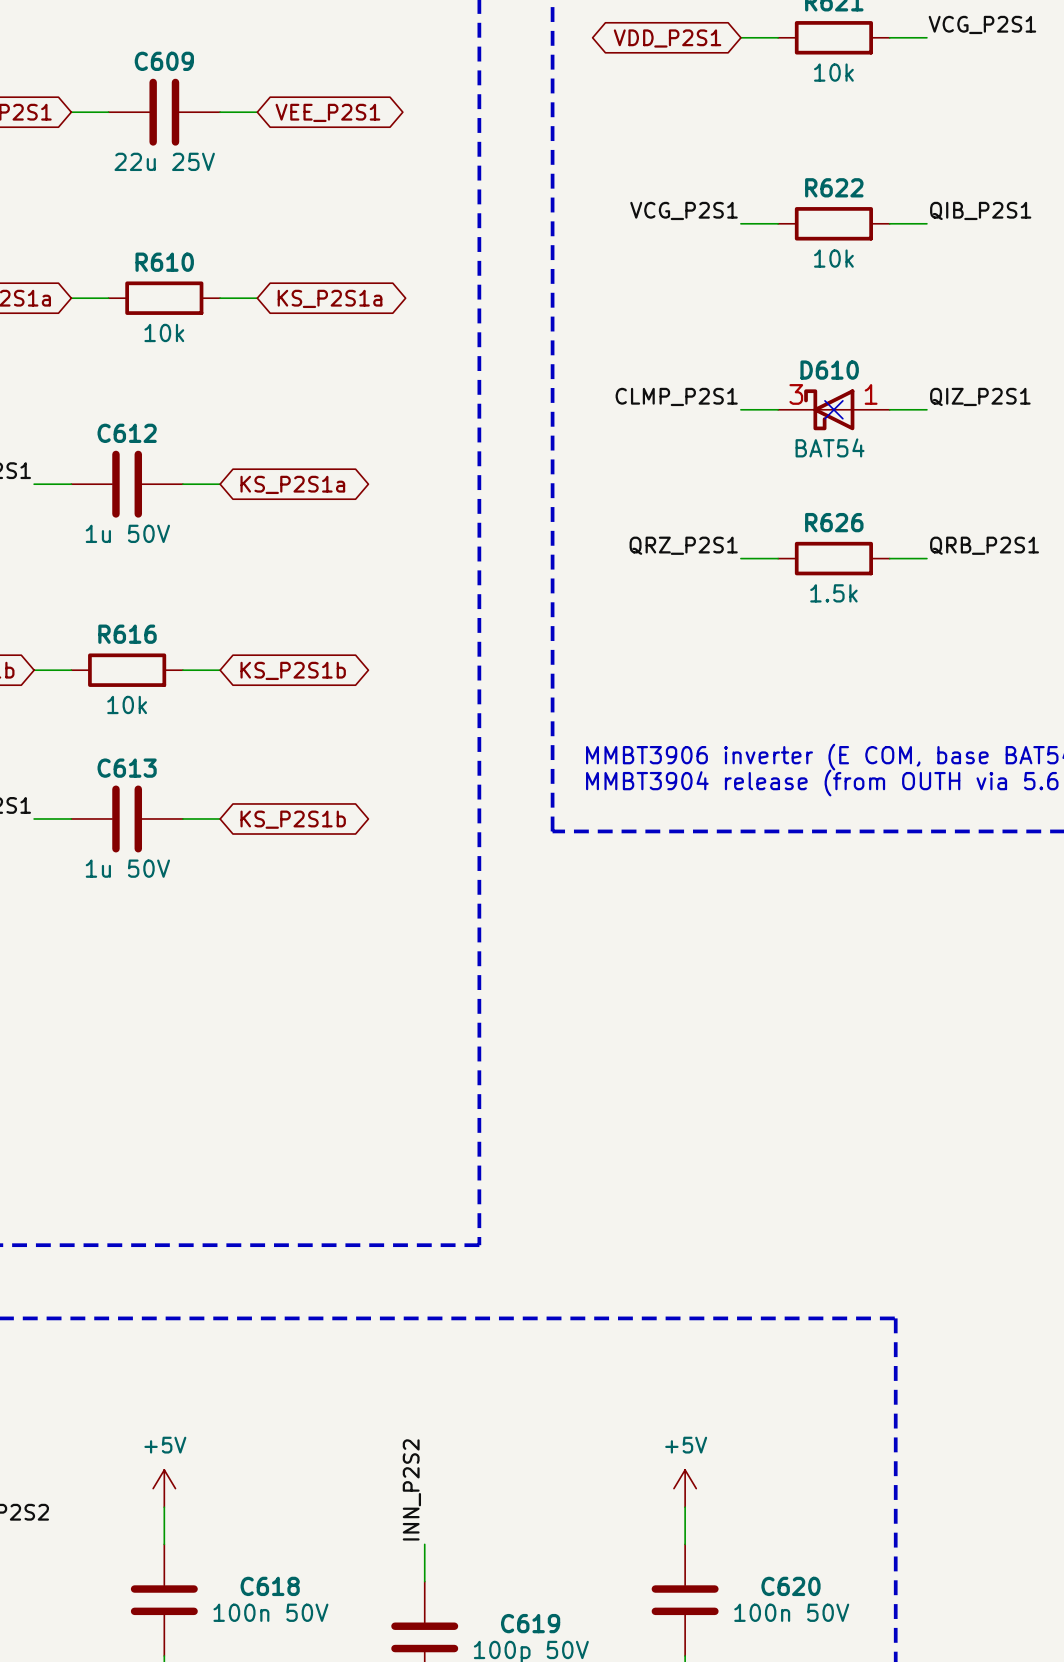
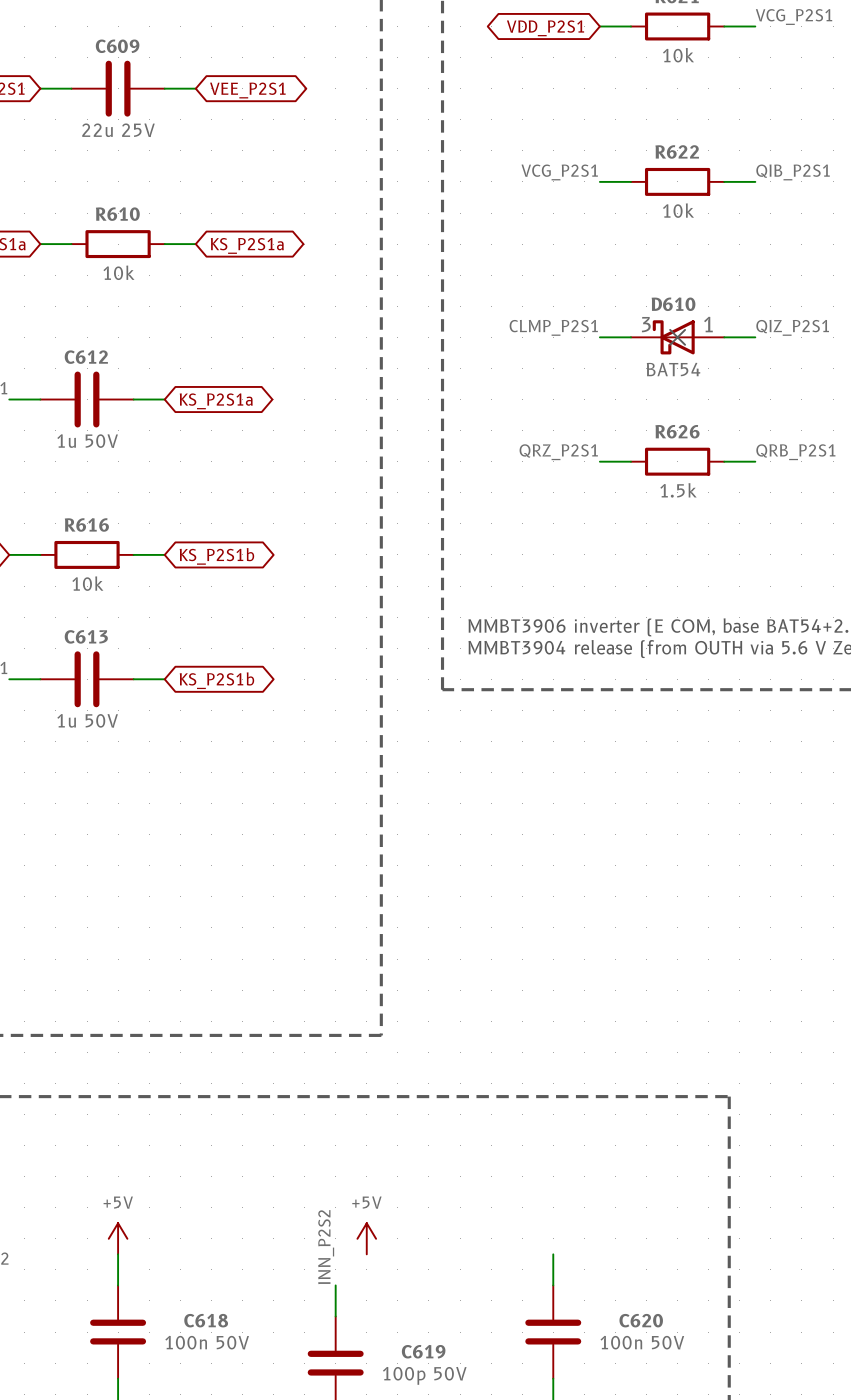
power symbol position: +5V (685, 1488) -> +5V (366, 1238)

